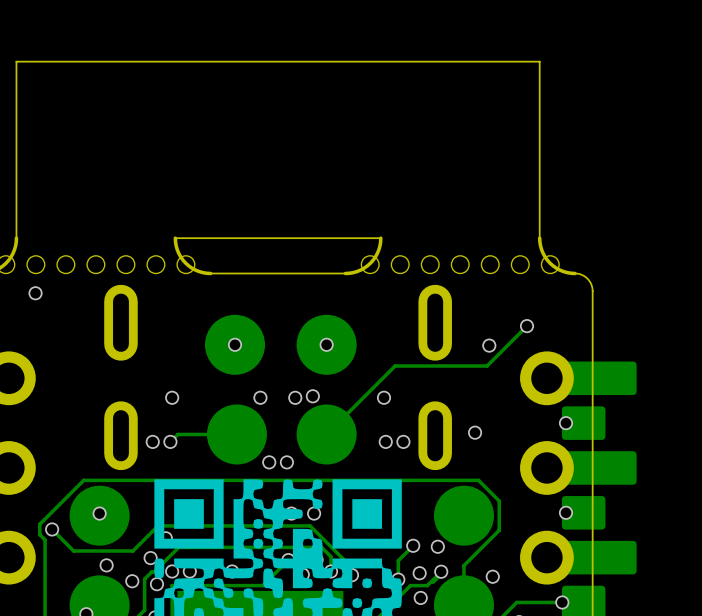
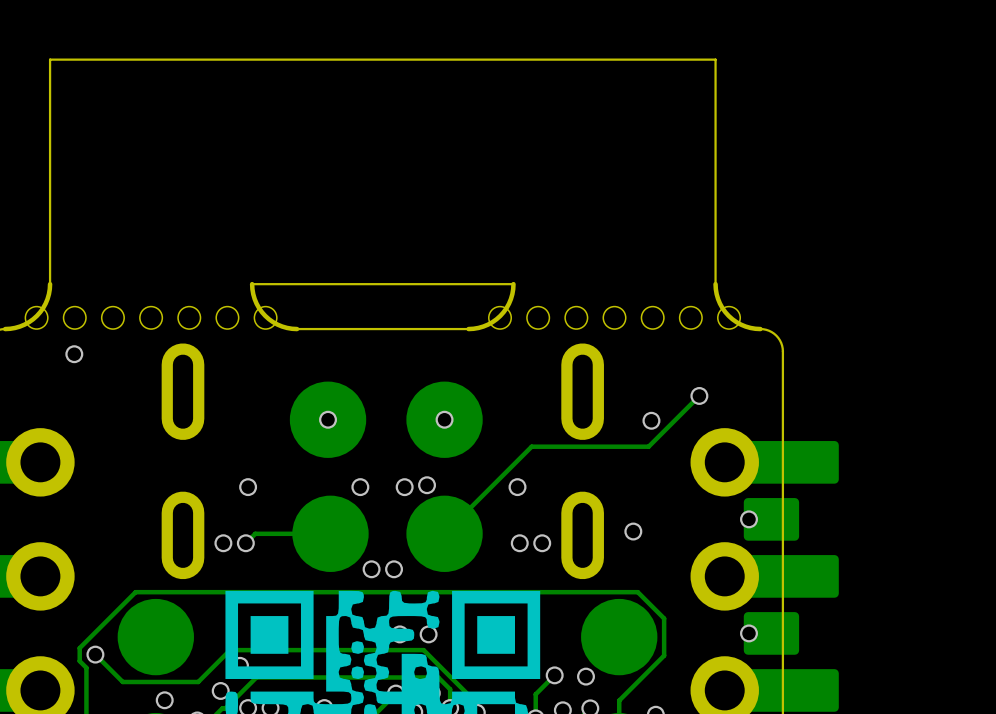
via: (99, 513) -> none

